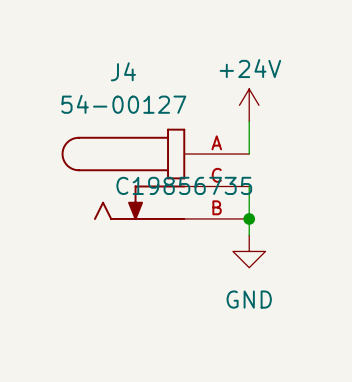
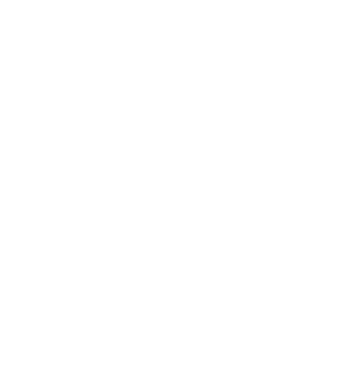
power symbol: +24V (249, 105) -> none
wire: (249, 121) (249, 154) -> none
J4: 54-00127 (155, 174) -> none
wire: (249, 186) (249, 235) -> none
junction: (249, 218) -> none
power symbol: GND (249, 251) -> none

